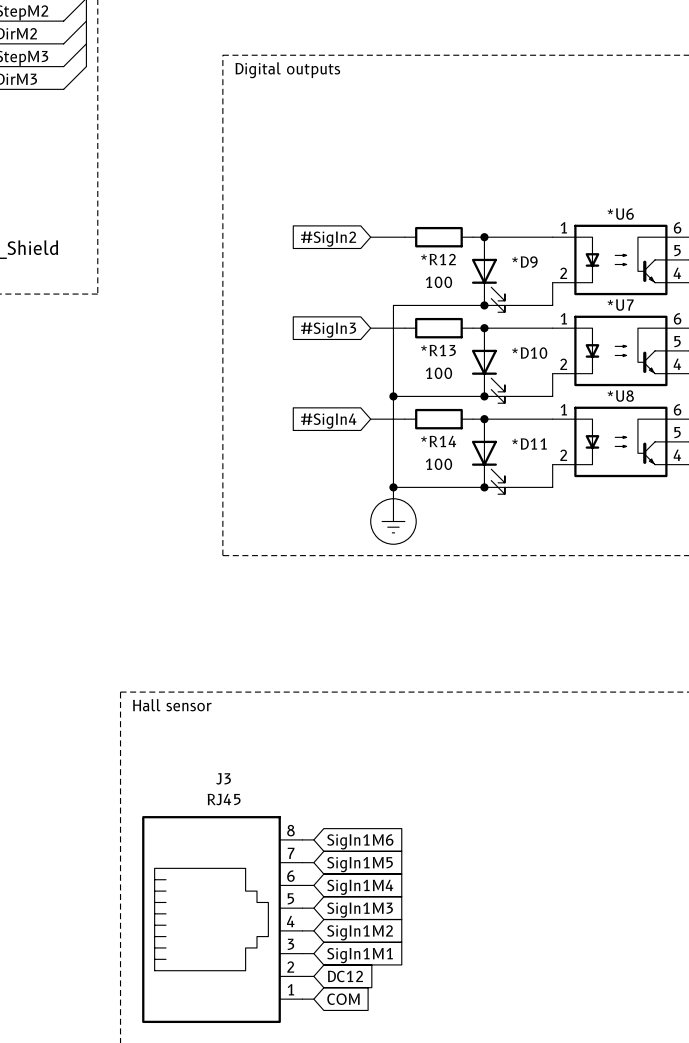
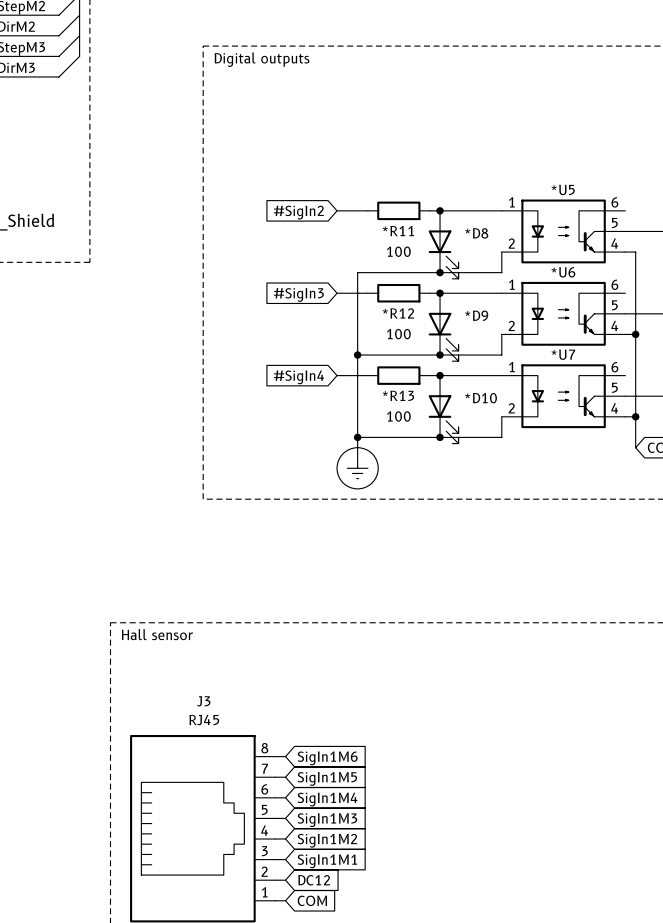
*U6 name: *U6 (620, 214) -> *U5 (563, 189)
*R12 name: *R12 (438, 259) -> *R11 (398, 231)
*D9 name: *D9 (524, 262) -> *D8 (476, 233)
*U7 name: *U7 (620, 305) -> *U6 (563, 272)
*R13 name: *R13 (438, 350) -> *R12 (398, 313)
*D10 name: *D10 (529, 353) -> *D9 (476, 315)
*U8 name: *U8 (620, 396) -> *U7 (563, 354)
*R14 name: *R14 (438, 441) -> *R13 (398, 395)
*D11 name: *D11 (529, 443) -> *D10 (481, 398)

